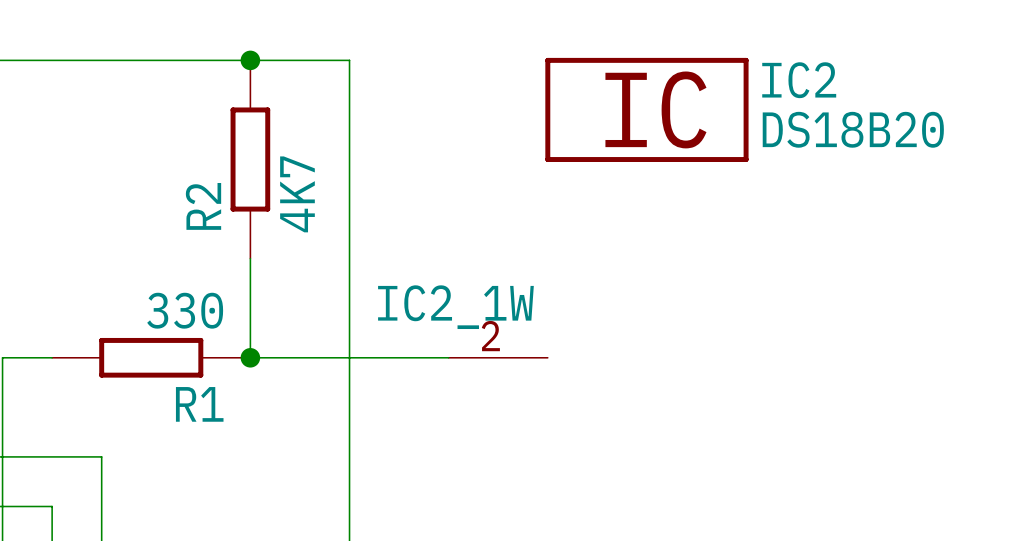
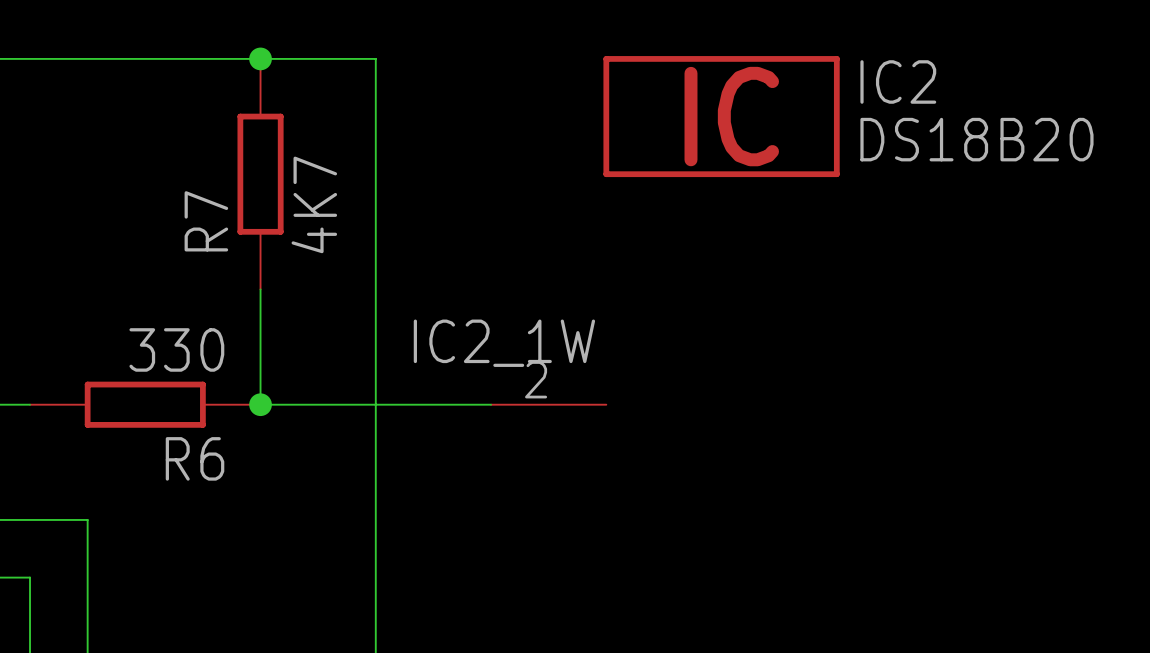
R2 name: R2 (203, 206) -> R7 (206, 221)
R1 name: R1 (199, 404) -> R6 (195, 458)

